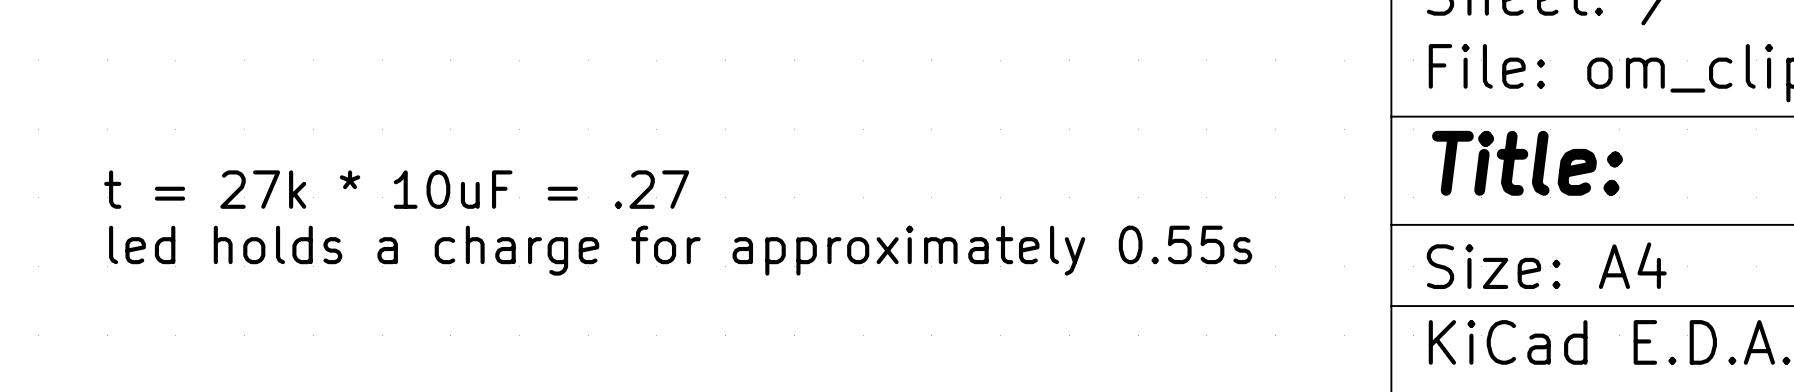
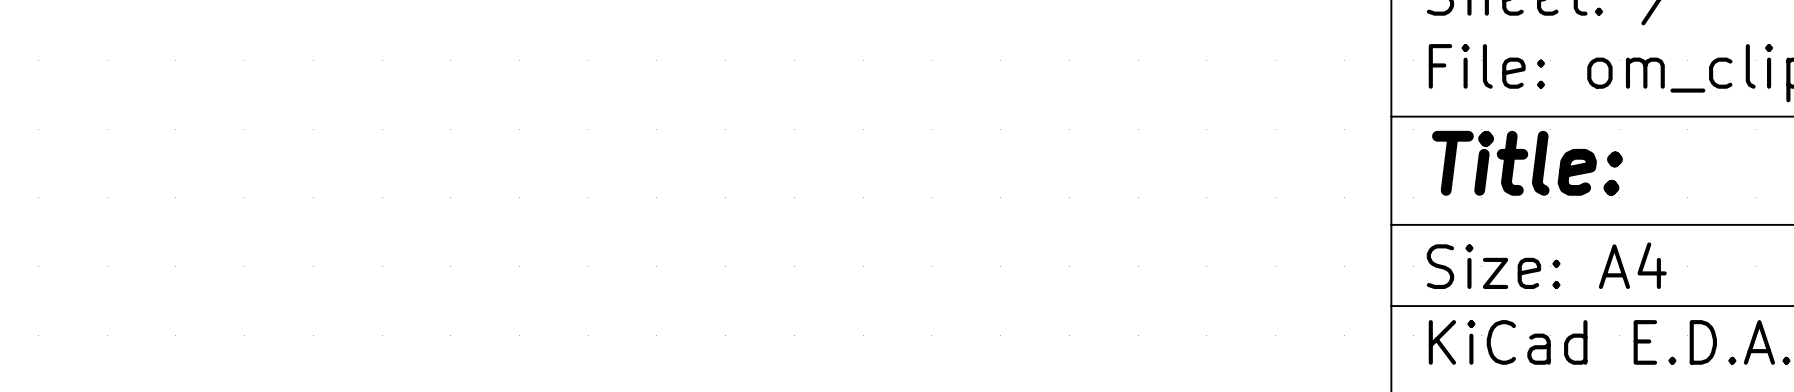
text: t = 27k * 10uF = .27 (396, 189) -> none
text: led holds a charge for approximately 0.55s (680, 250) -> none

